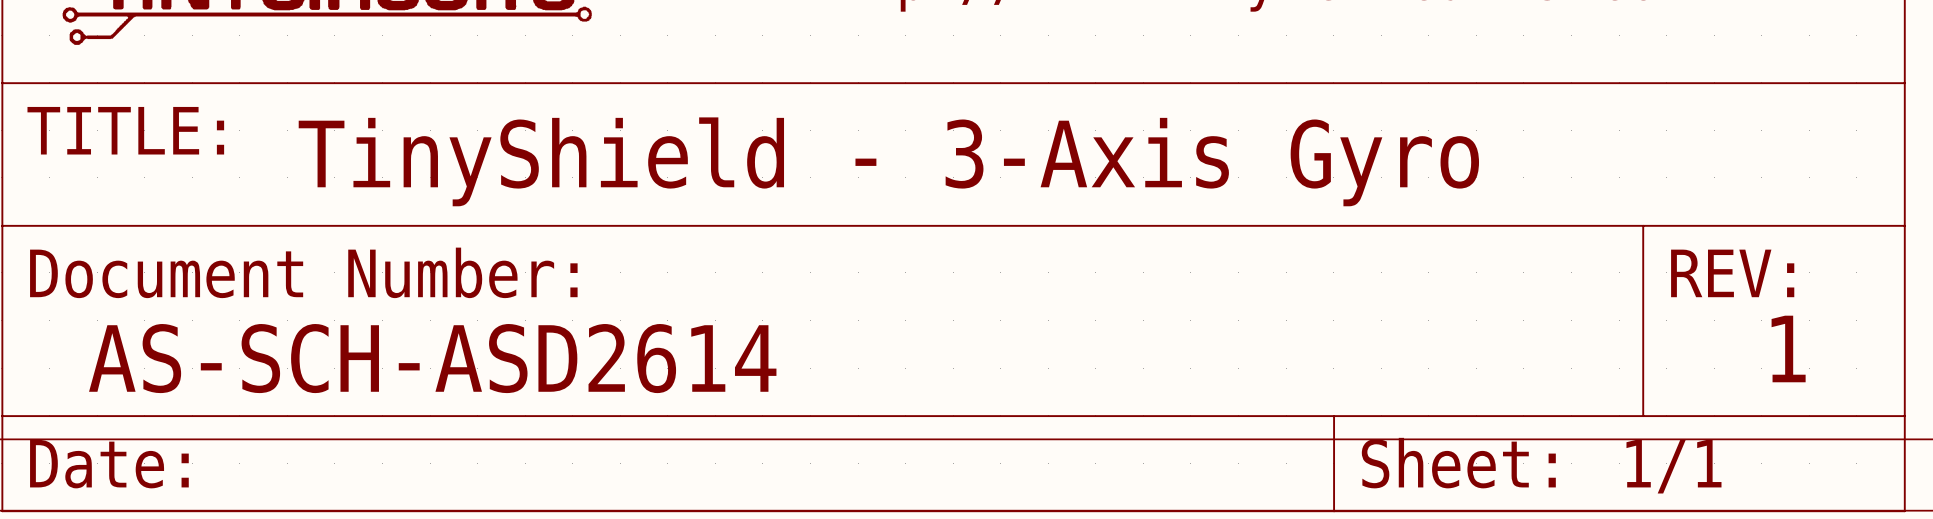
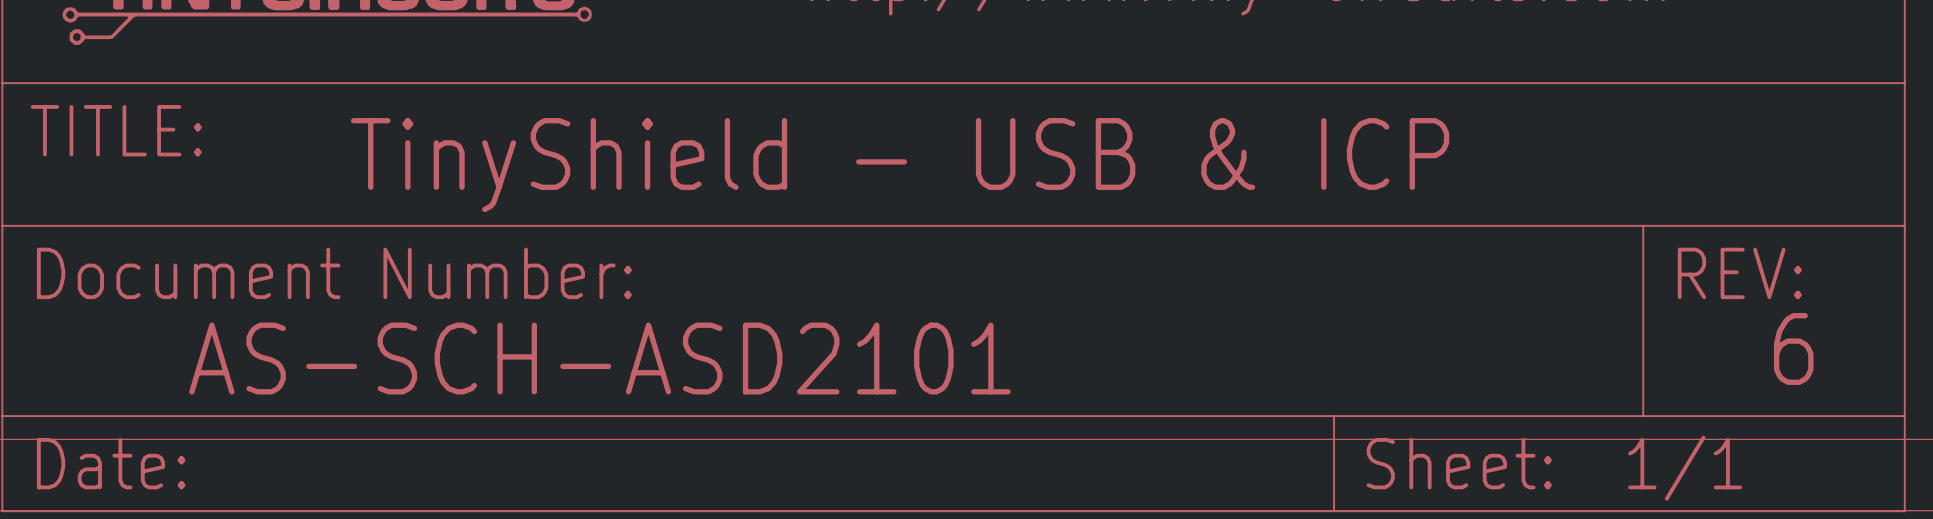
text: TinyShield - 3-Axis Gyro (888, 161) -> TinyShield - USB & ICP (900, 165)
text: 1 (1788, 348) -> 6 (1793, 348)
text: AS-SCH-ASD2614 (432, 358) -> AS-SCH-ASD2101 (599, 358)

